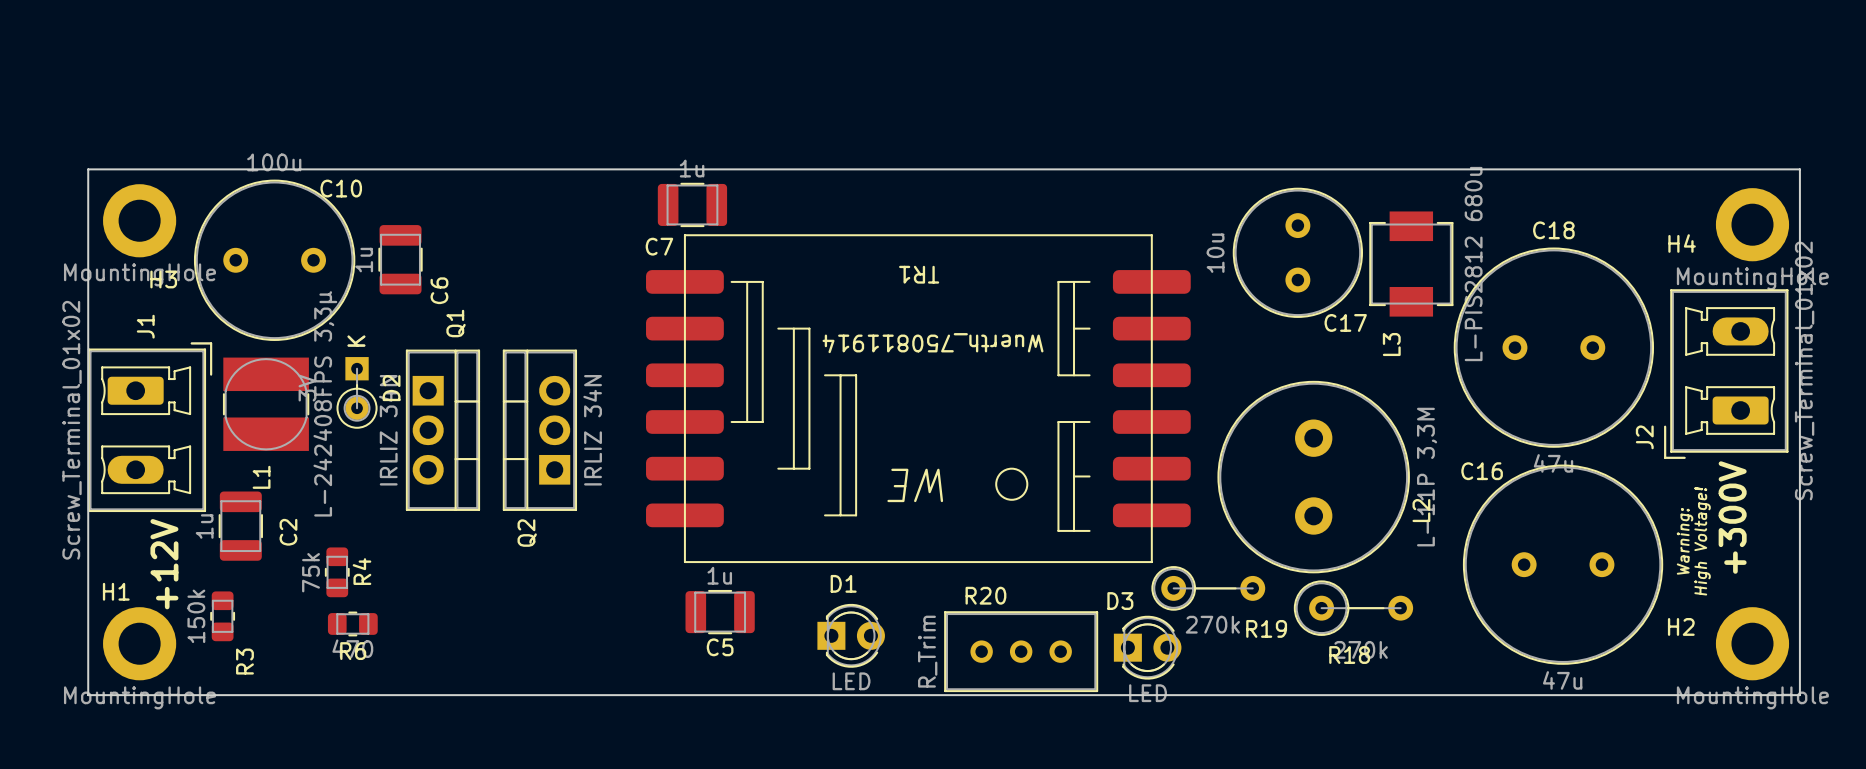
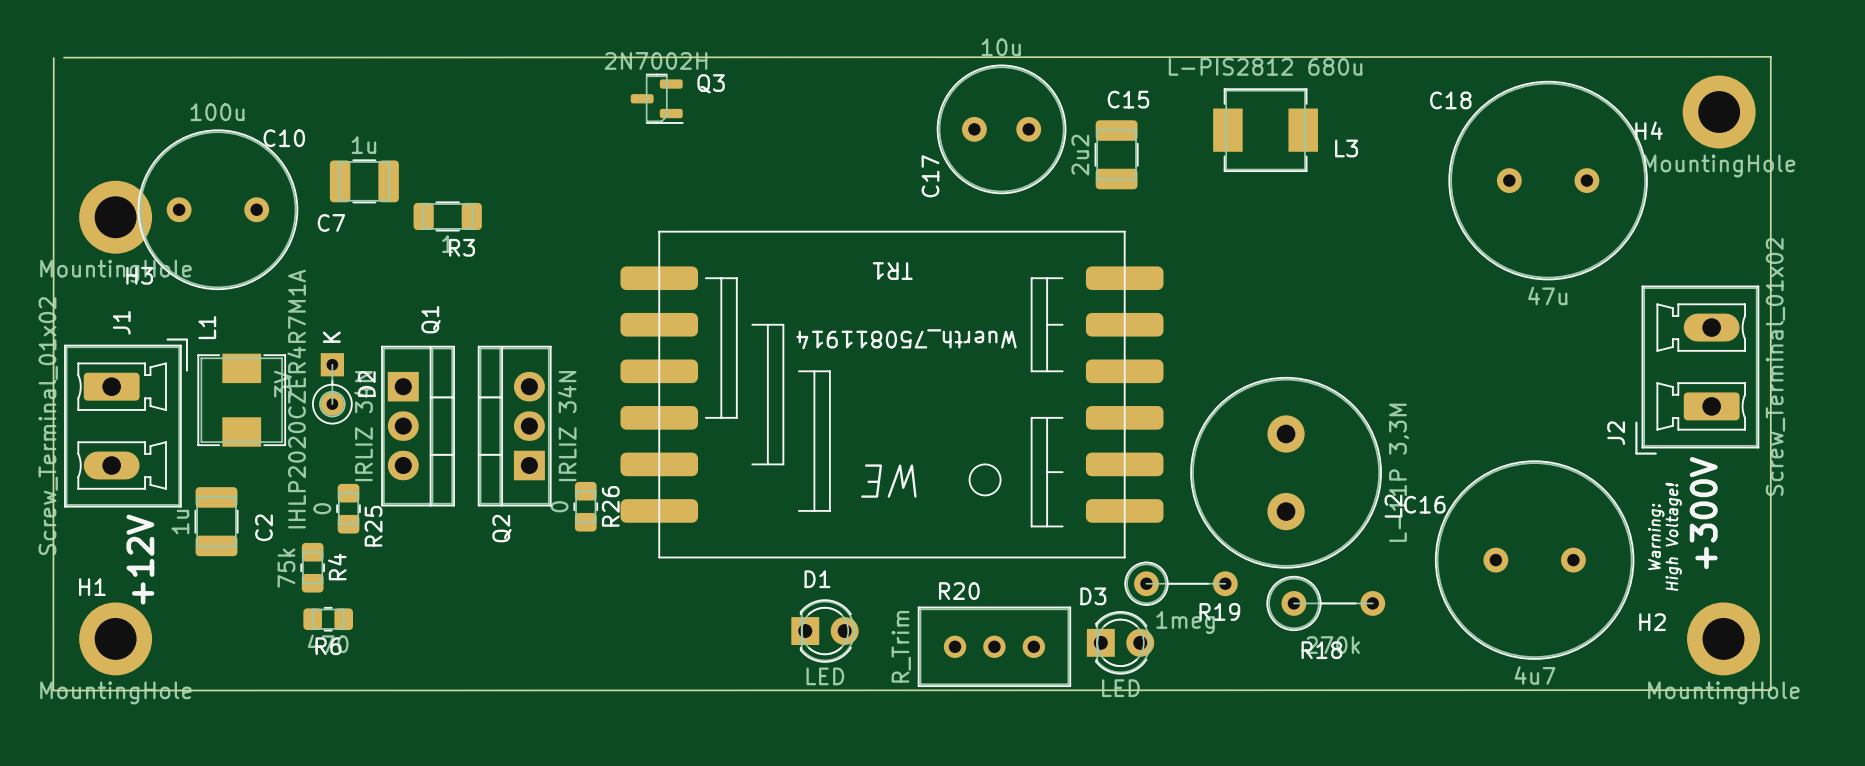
board edge: none -> (63, 57) (1770, 56) (1770, 166)
board edge: none -> (53, 58) (53, 690)
Q3: none -> 2N7002H (657, 98)
C15: none -> 2u2 (1116, 154)
board edge: (1799, 169) (88, 169) (88, 695) (1799, 695) -> (52, 690) (1770, 690)
C7 position: (692, 204) -> (364, 181)
H4 position: (1752, 224) -> (1719, 112)
C18 name position: C18 (1553, 230) -> C18 (1450, 100)
C17 rotation: 0° (1297, 252) -> 90° clockwise (1001, 129)
C17 position: (1297, 252) -> (1001, 129)
C6: 1u (400, 259) -> none
C10 position: (274, 260) -> (217, 209)
L3 rotation: 0° (1411, 264) -> 90° clockwise (1265, 130)
L3 position: (1411, 264) -> (1265, 130)
L3 value position: L-PIS2812 680u (1473, 264) -> L-PIS2812 680u (1265, 66)
L3 name position: L3 (1391, 344) -> L3 (1346, 148)
C18 position: (1553, 347) -> (1548, 180)
L1 footprint: [223, 357, 310, 451] -> [197, 353, 287, 447]
L1 value: L-242408FPS 3,3µ (325, 403) -> IHLP2020CZER4R7M1A (296, 399)
C16 name position: C16 (1482, 471) -> C16 (1424, 504)
L1 name position: L1 (261, 477) -> L1 (207, 327)
R26: none -> 0 (585, 506)
R25: none -> 0 (348, 508)
R3 footprint: [210, 591, 236, 642] -> [413, 201, 482, 232]
C5: 1u (720, 612) -> none
R3 value: 150k (196, 616) -> 1 (447, 244)
R19 value: 270k (1212, 624) -> 1meg (1185, 622)
R19 name position: R19 (1266, 628) -> R19 (1219, 611)
C16 value: 47u (1562, 680) -> 4u7 (1535, 675)

